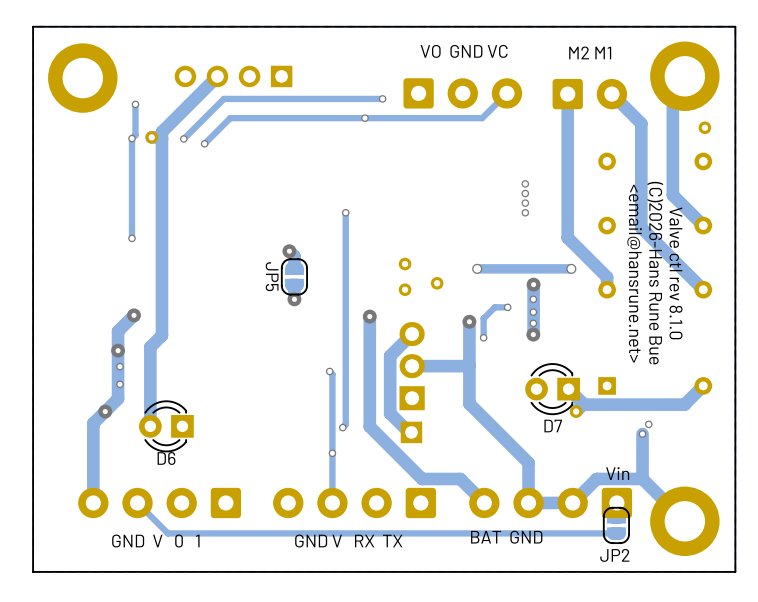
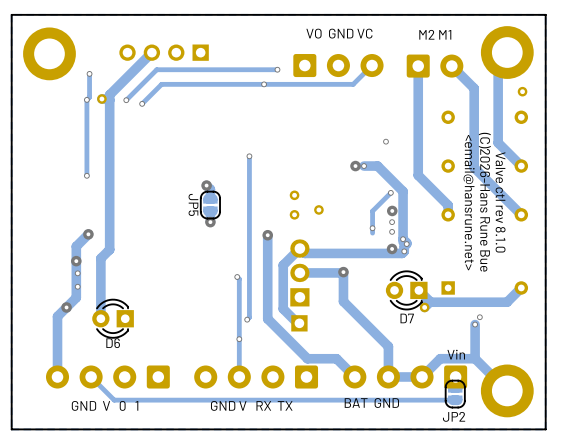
via: (525, 183) -> none
via: (525, 203) -> none
via: (525, 212) -> none
via: none -> (355, 166)
track: none -> (364, 166) (377, 166) (403, 191) (403, 241)
via: none -> (364, 166)
track: none -> (390, 192) (372, 211) (372, 233)
via: none -> (390, 192)
via: (477, 268) -> none
track: (571, 268) (477, 268) -> none
via: (571, 268) -> none
track: (533, 284) (533, 334) -> none
track: (507, 307) (494, 307) (483, 318) (483, 337) -> none
track: (469, 321) (469, 365) -> none
via position: (469, 321) -> (343, 272)
track: none -> (403, 239) (406, 244) (402, 253) (304, 253) (299, 248)
via: none -> (403, 239)
via: (533, 323) -> none
via: none -> (406, 244)
via: (483, 337) -> none
via: none -> (404, 251)

